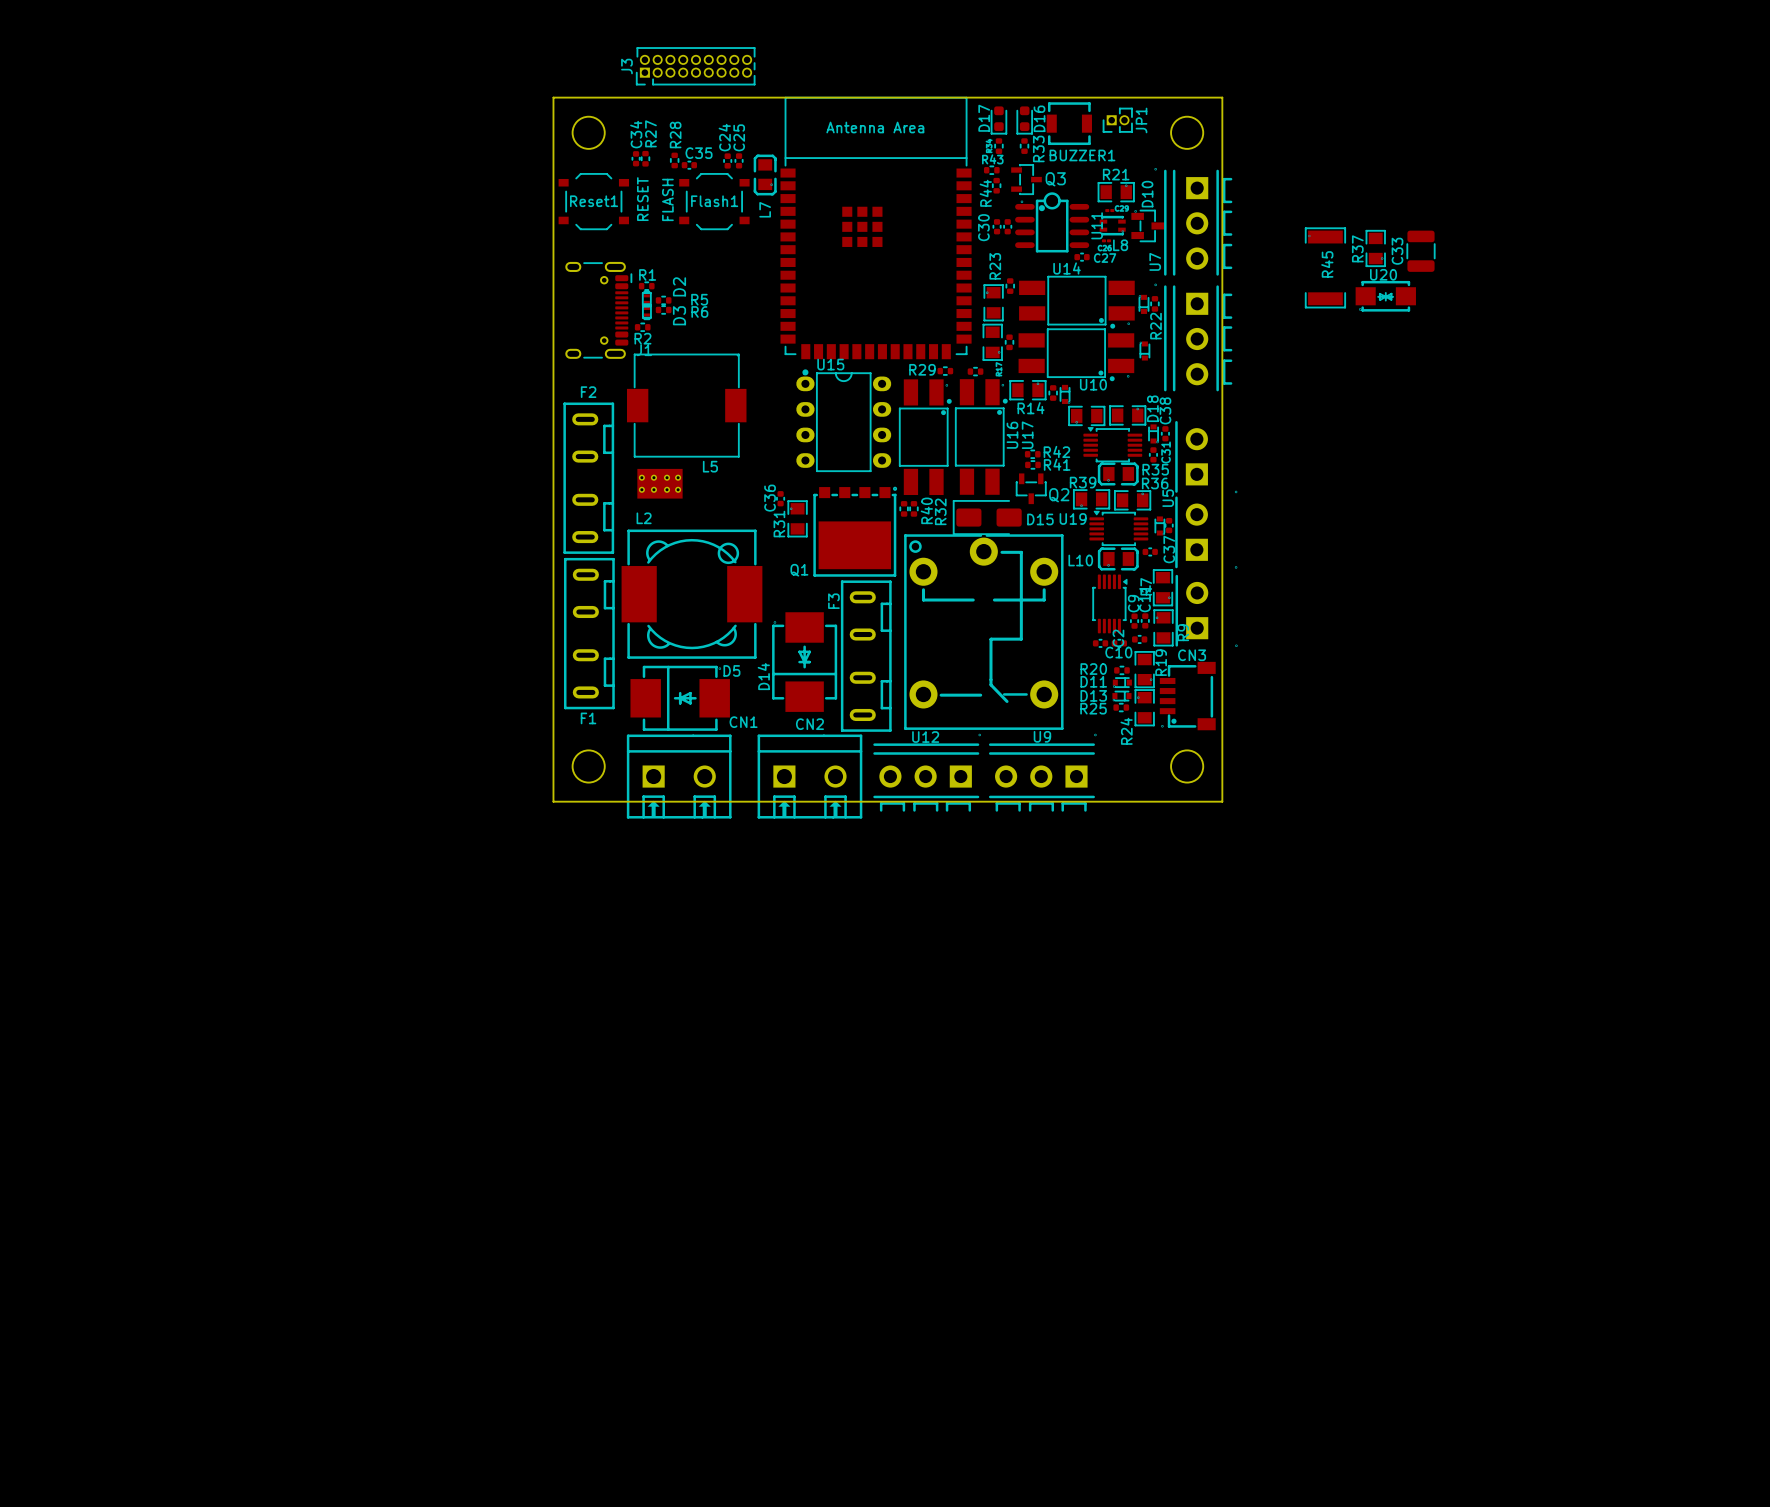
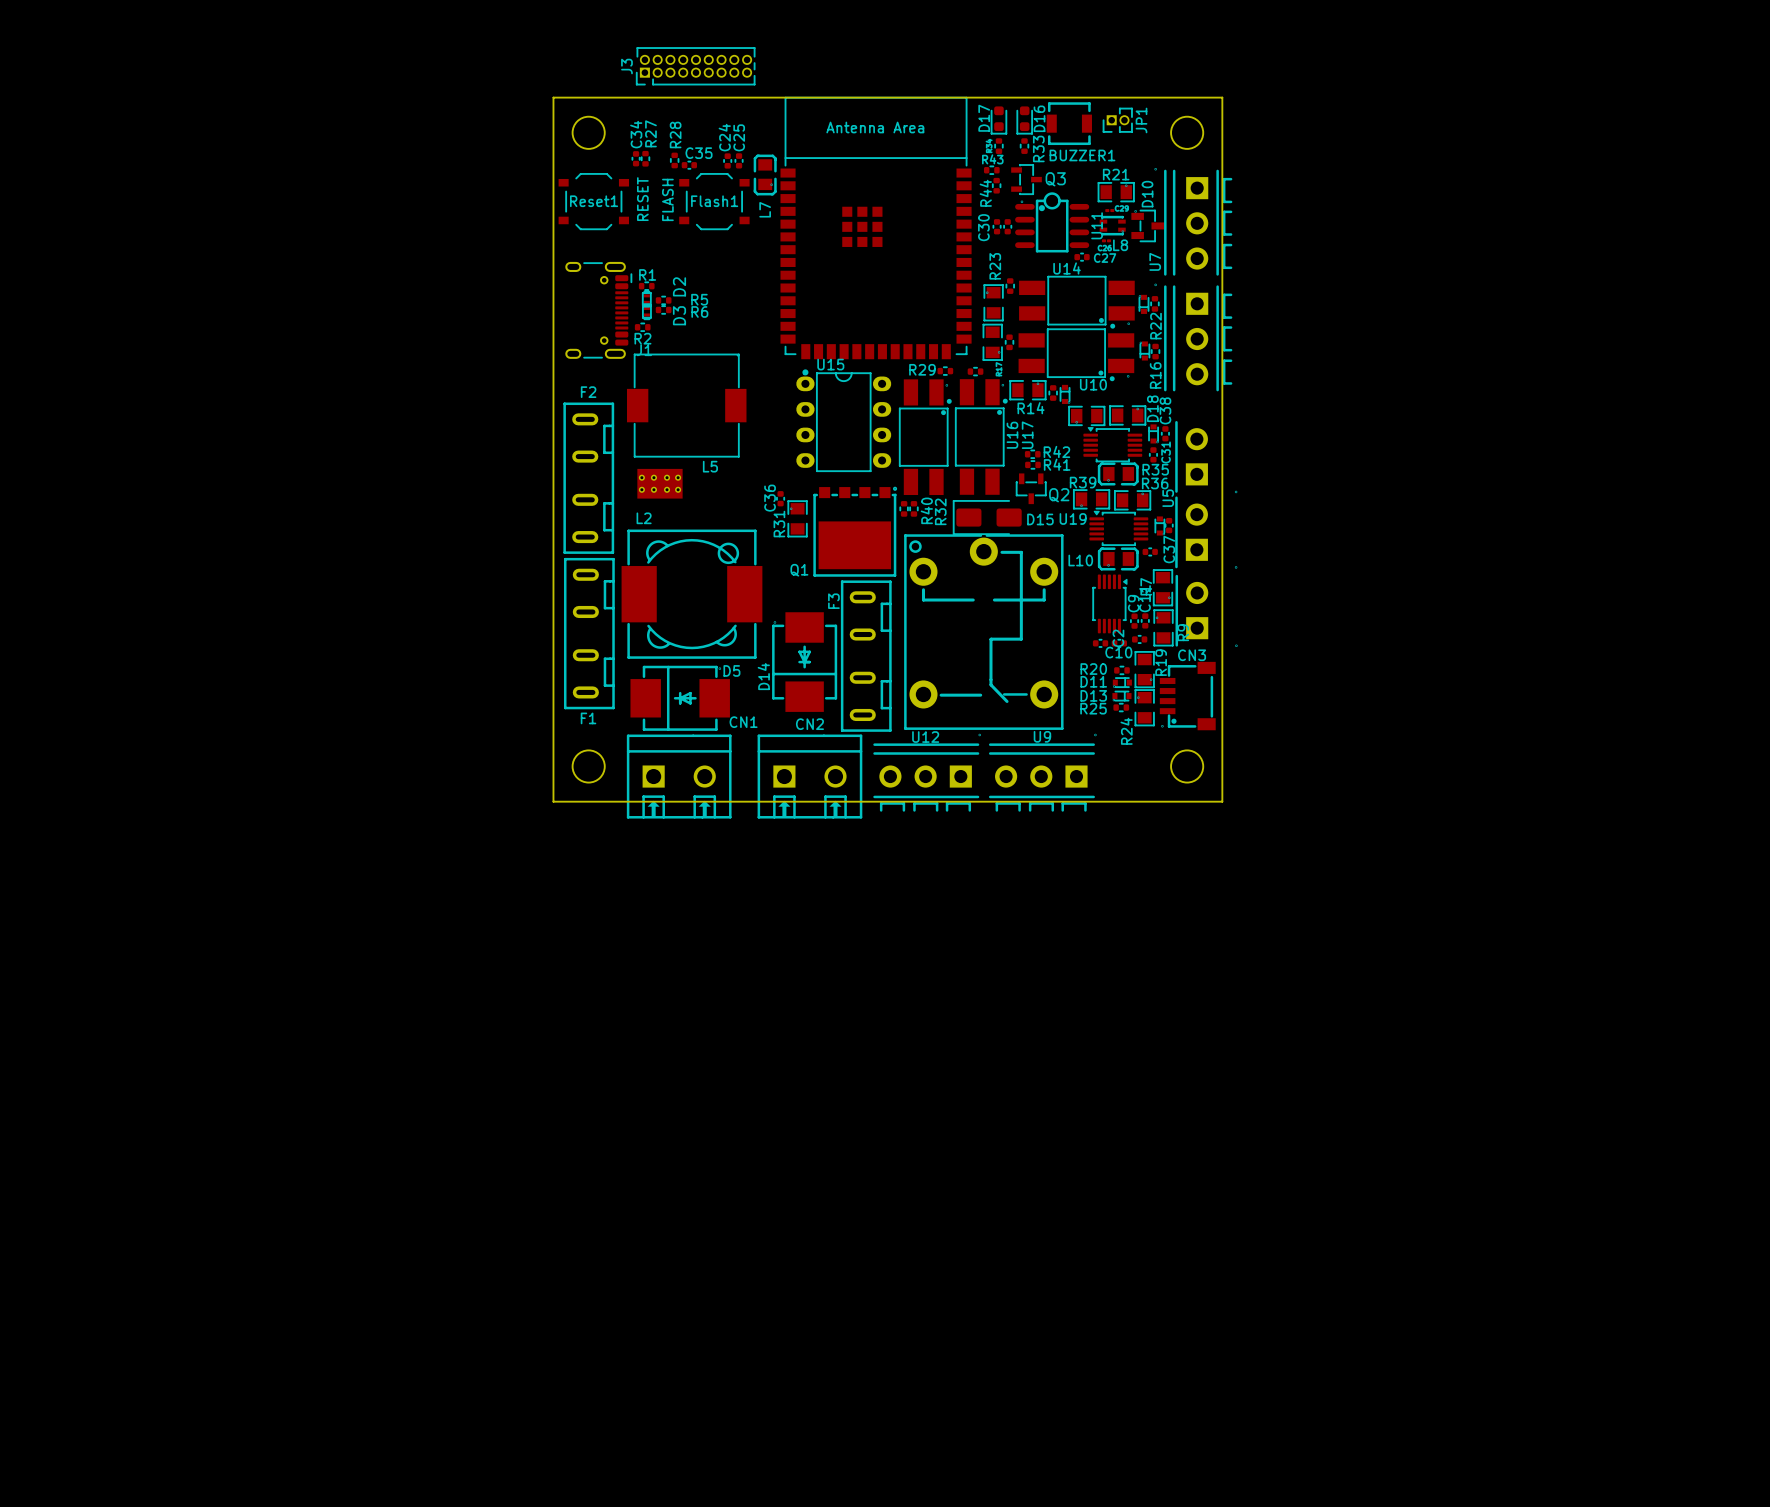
R37: (1375, 248) -> none
C33: (1420, 251) -> none
R45: (1325, 267) -> none
U20: (1385, 296) -> none
R16: none -> (1155, 351)

